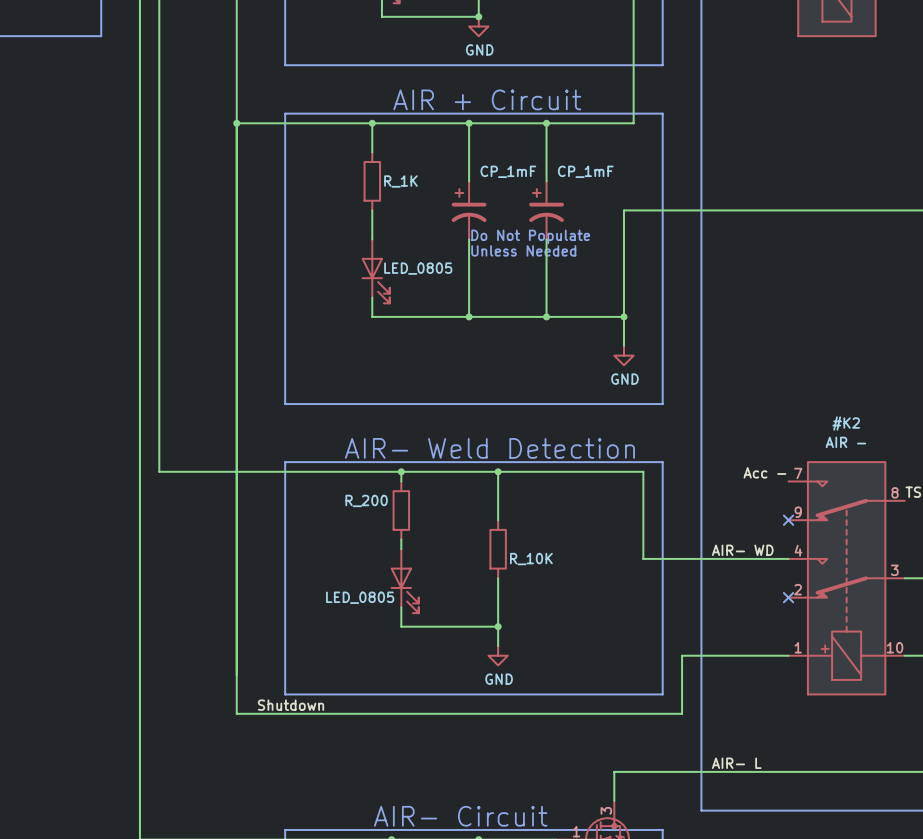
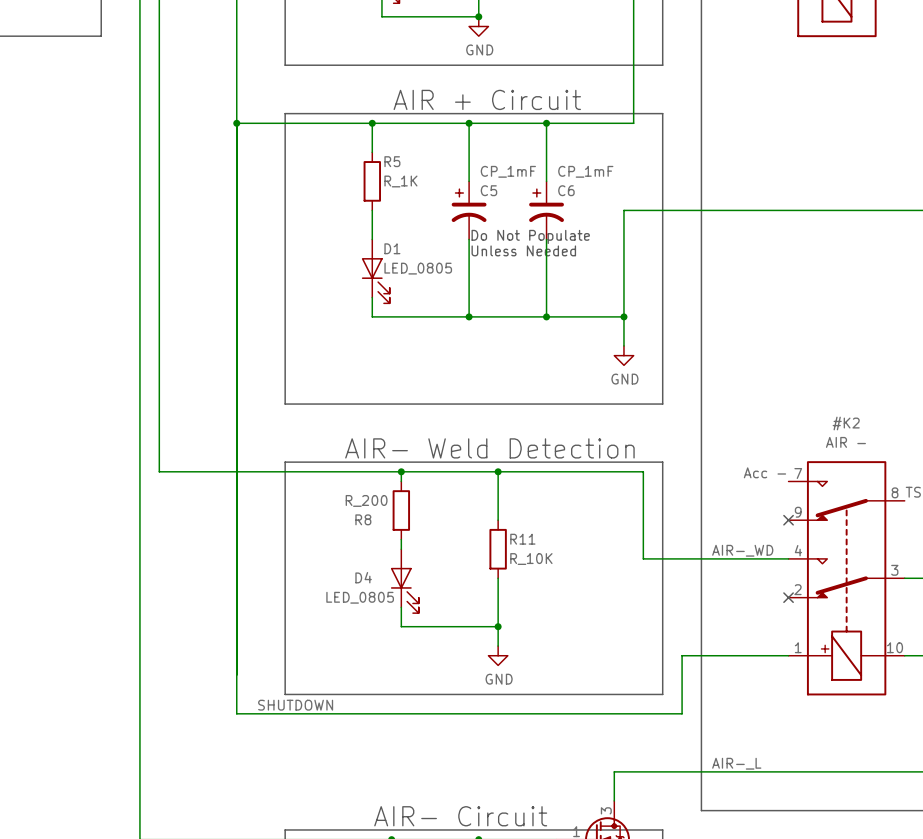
R5 name: none -> R5 (392, 161)
C5 name: none -> C5 (488, 190)
C6 name: none -> C6 (566, 190)
D1 name: none -> D1 (392, 248)
R8 name: none -> R8 (363, 519)
R11 name: none -> R11 (522, 539)
label: AIR- WD (742, 550) -> AIR-_WD (742, 550)
D4 name: none -> D4 (363, 577)
label: Shutdown (290, 705) -> SHUTDOWN (295, 705)
label: AIR- L (736, 763) -> AIR-_L (736, 763)

